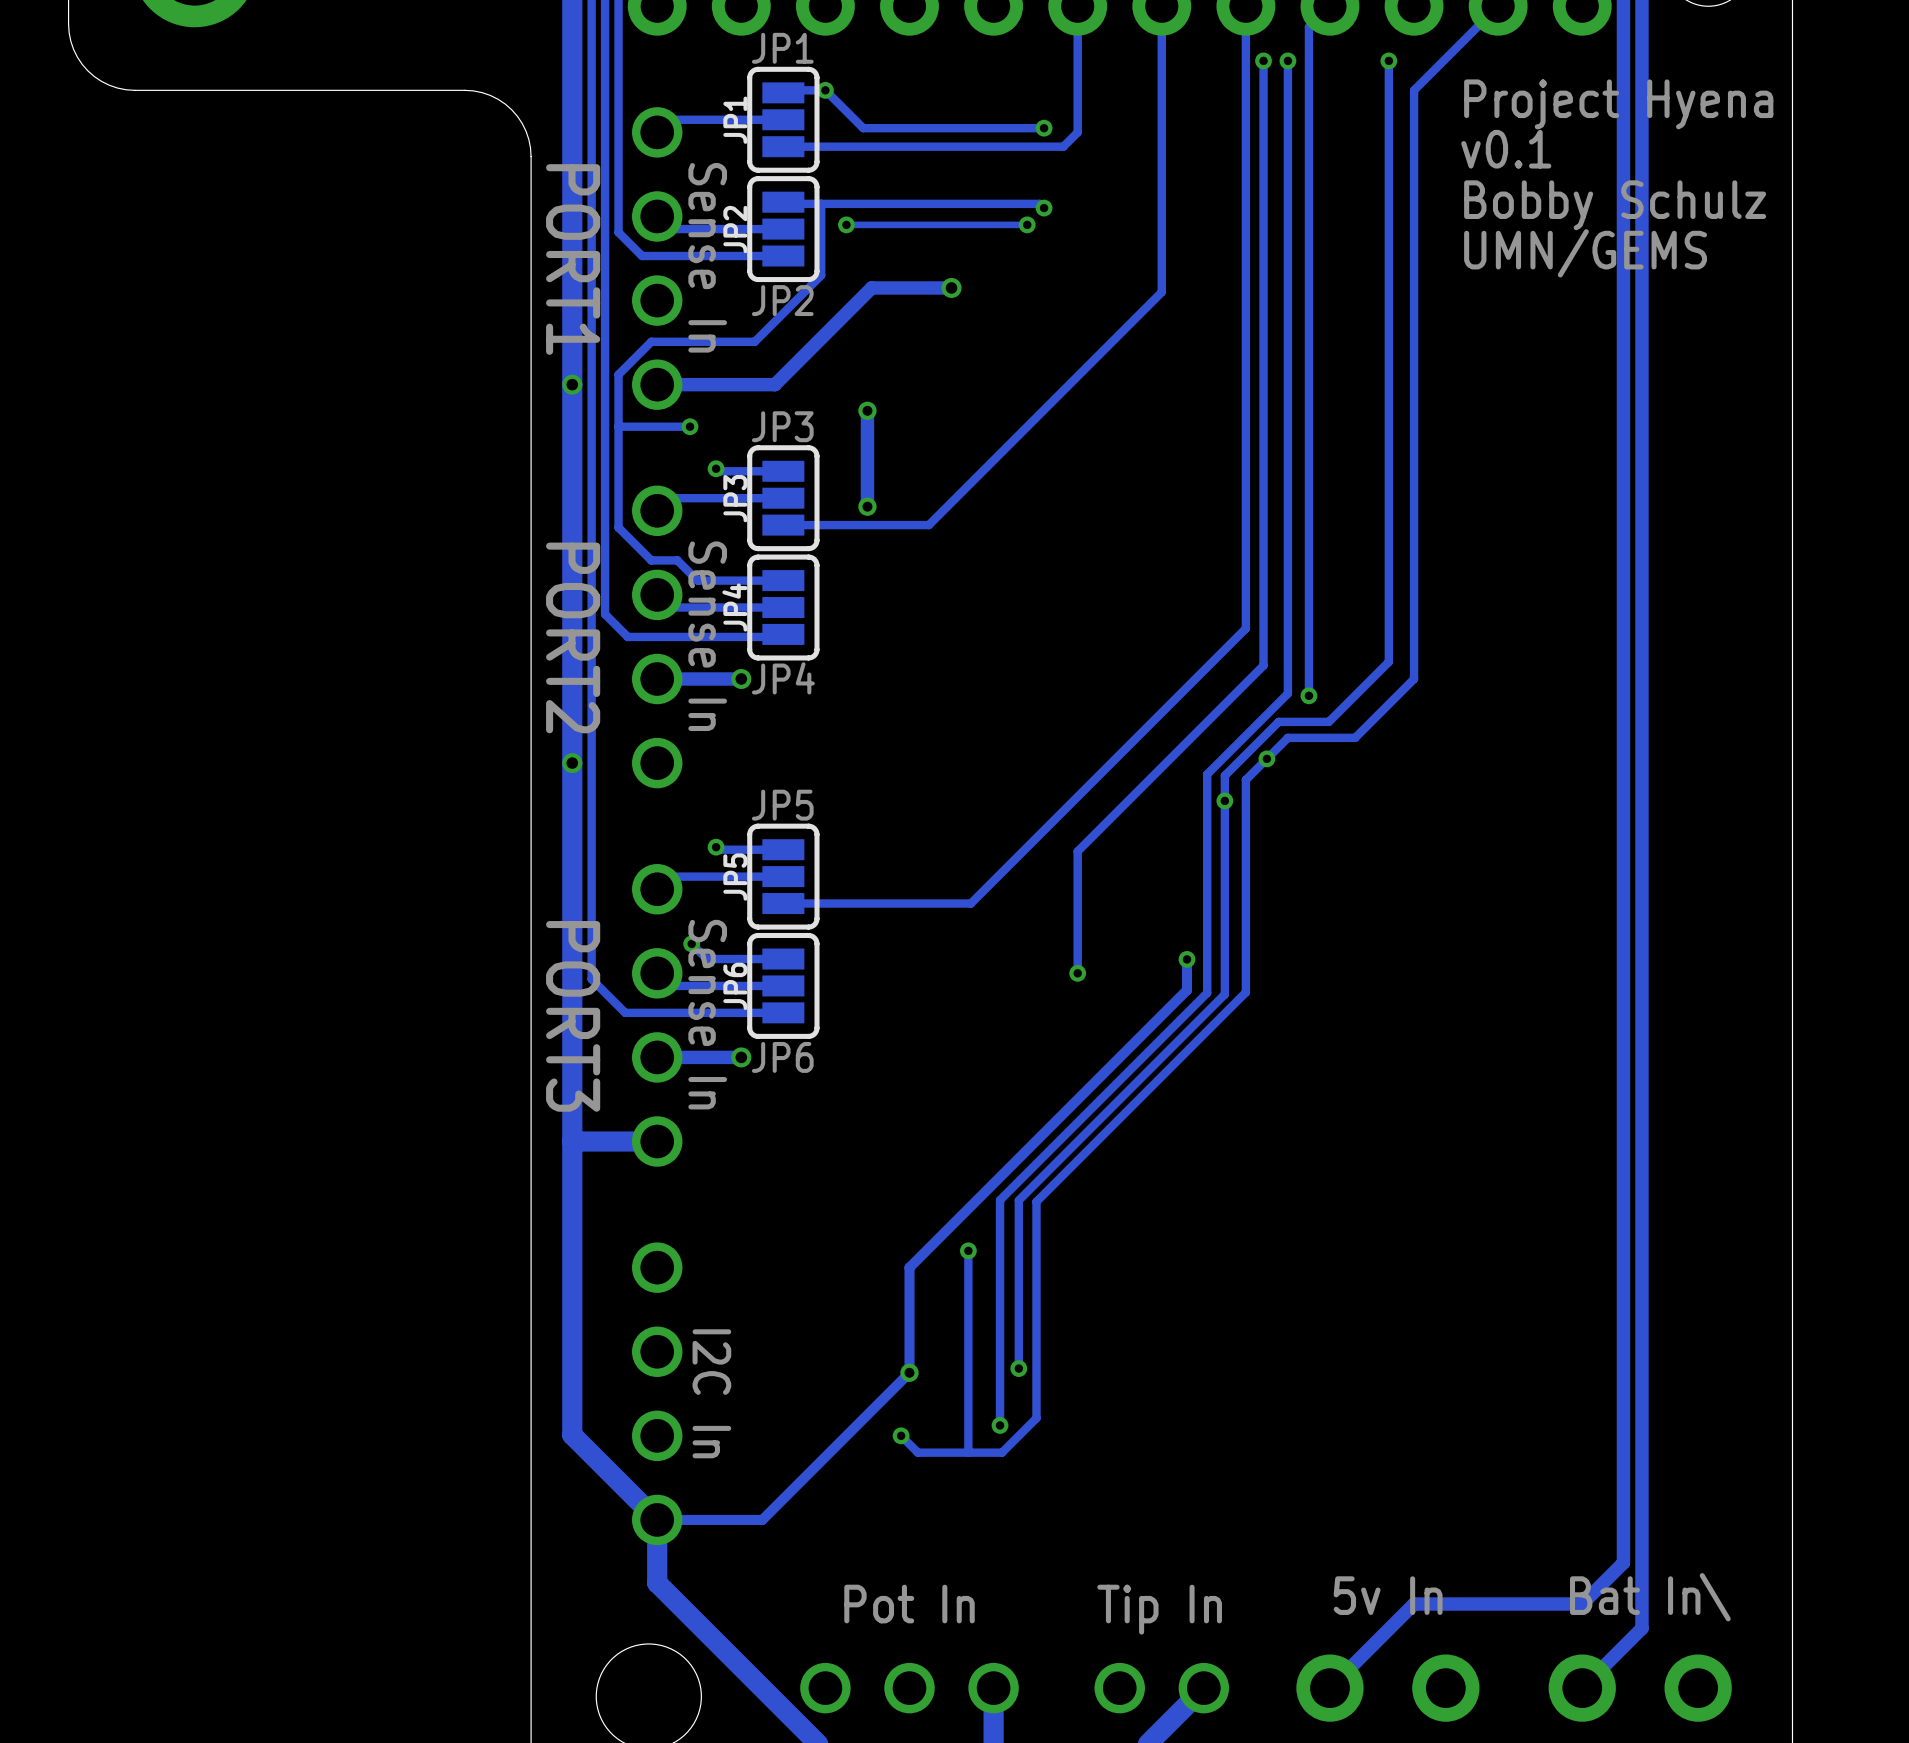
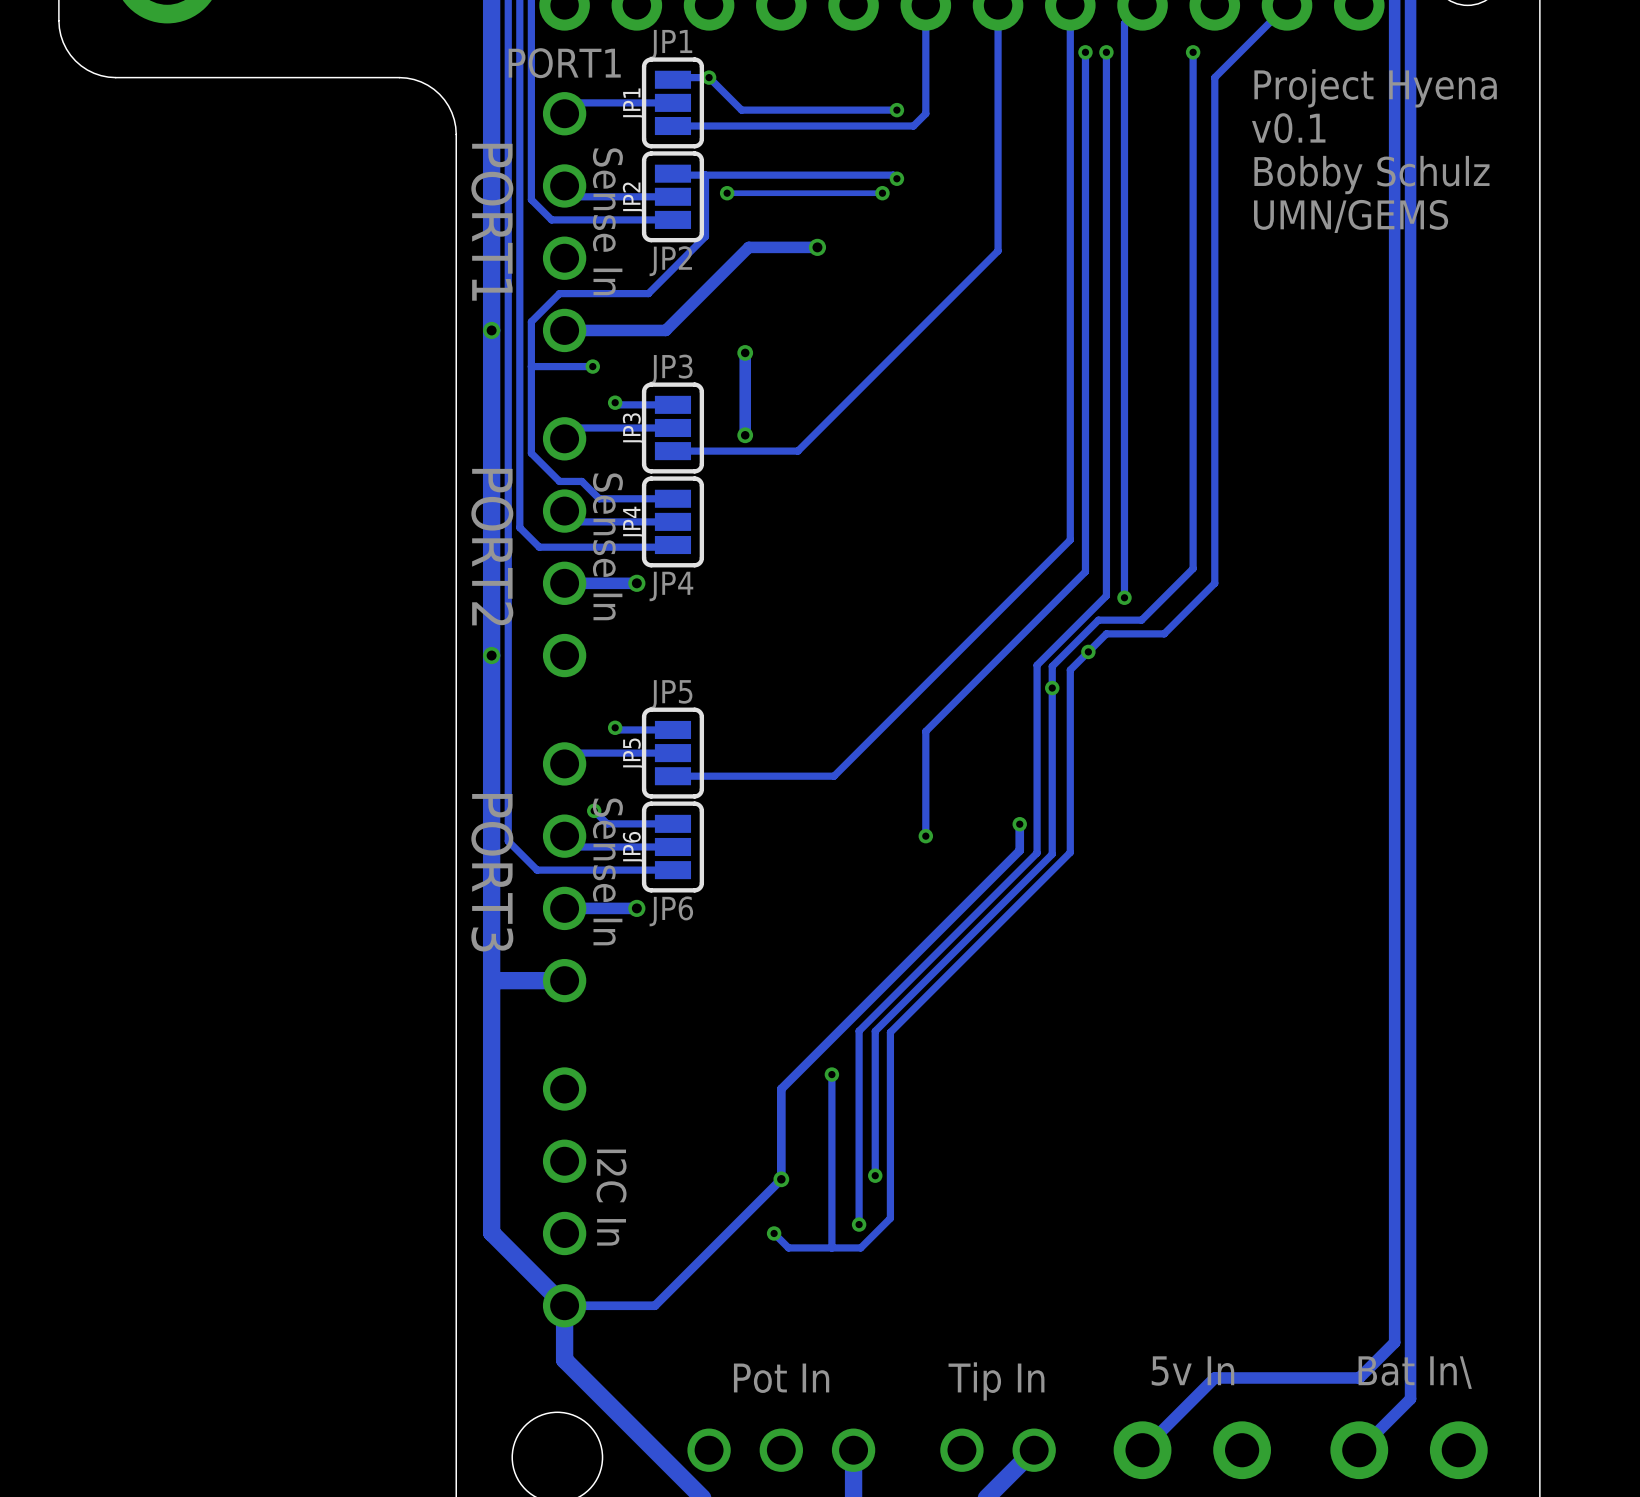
text: none -> PORT1 (564, 63)

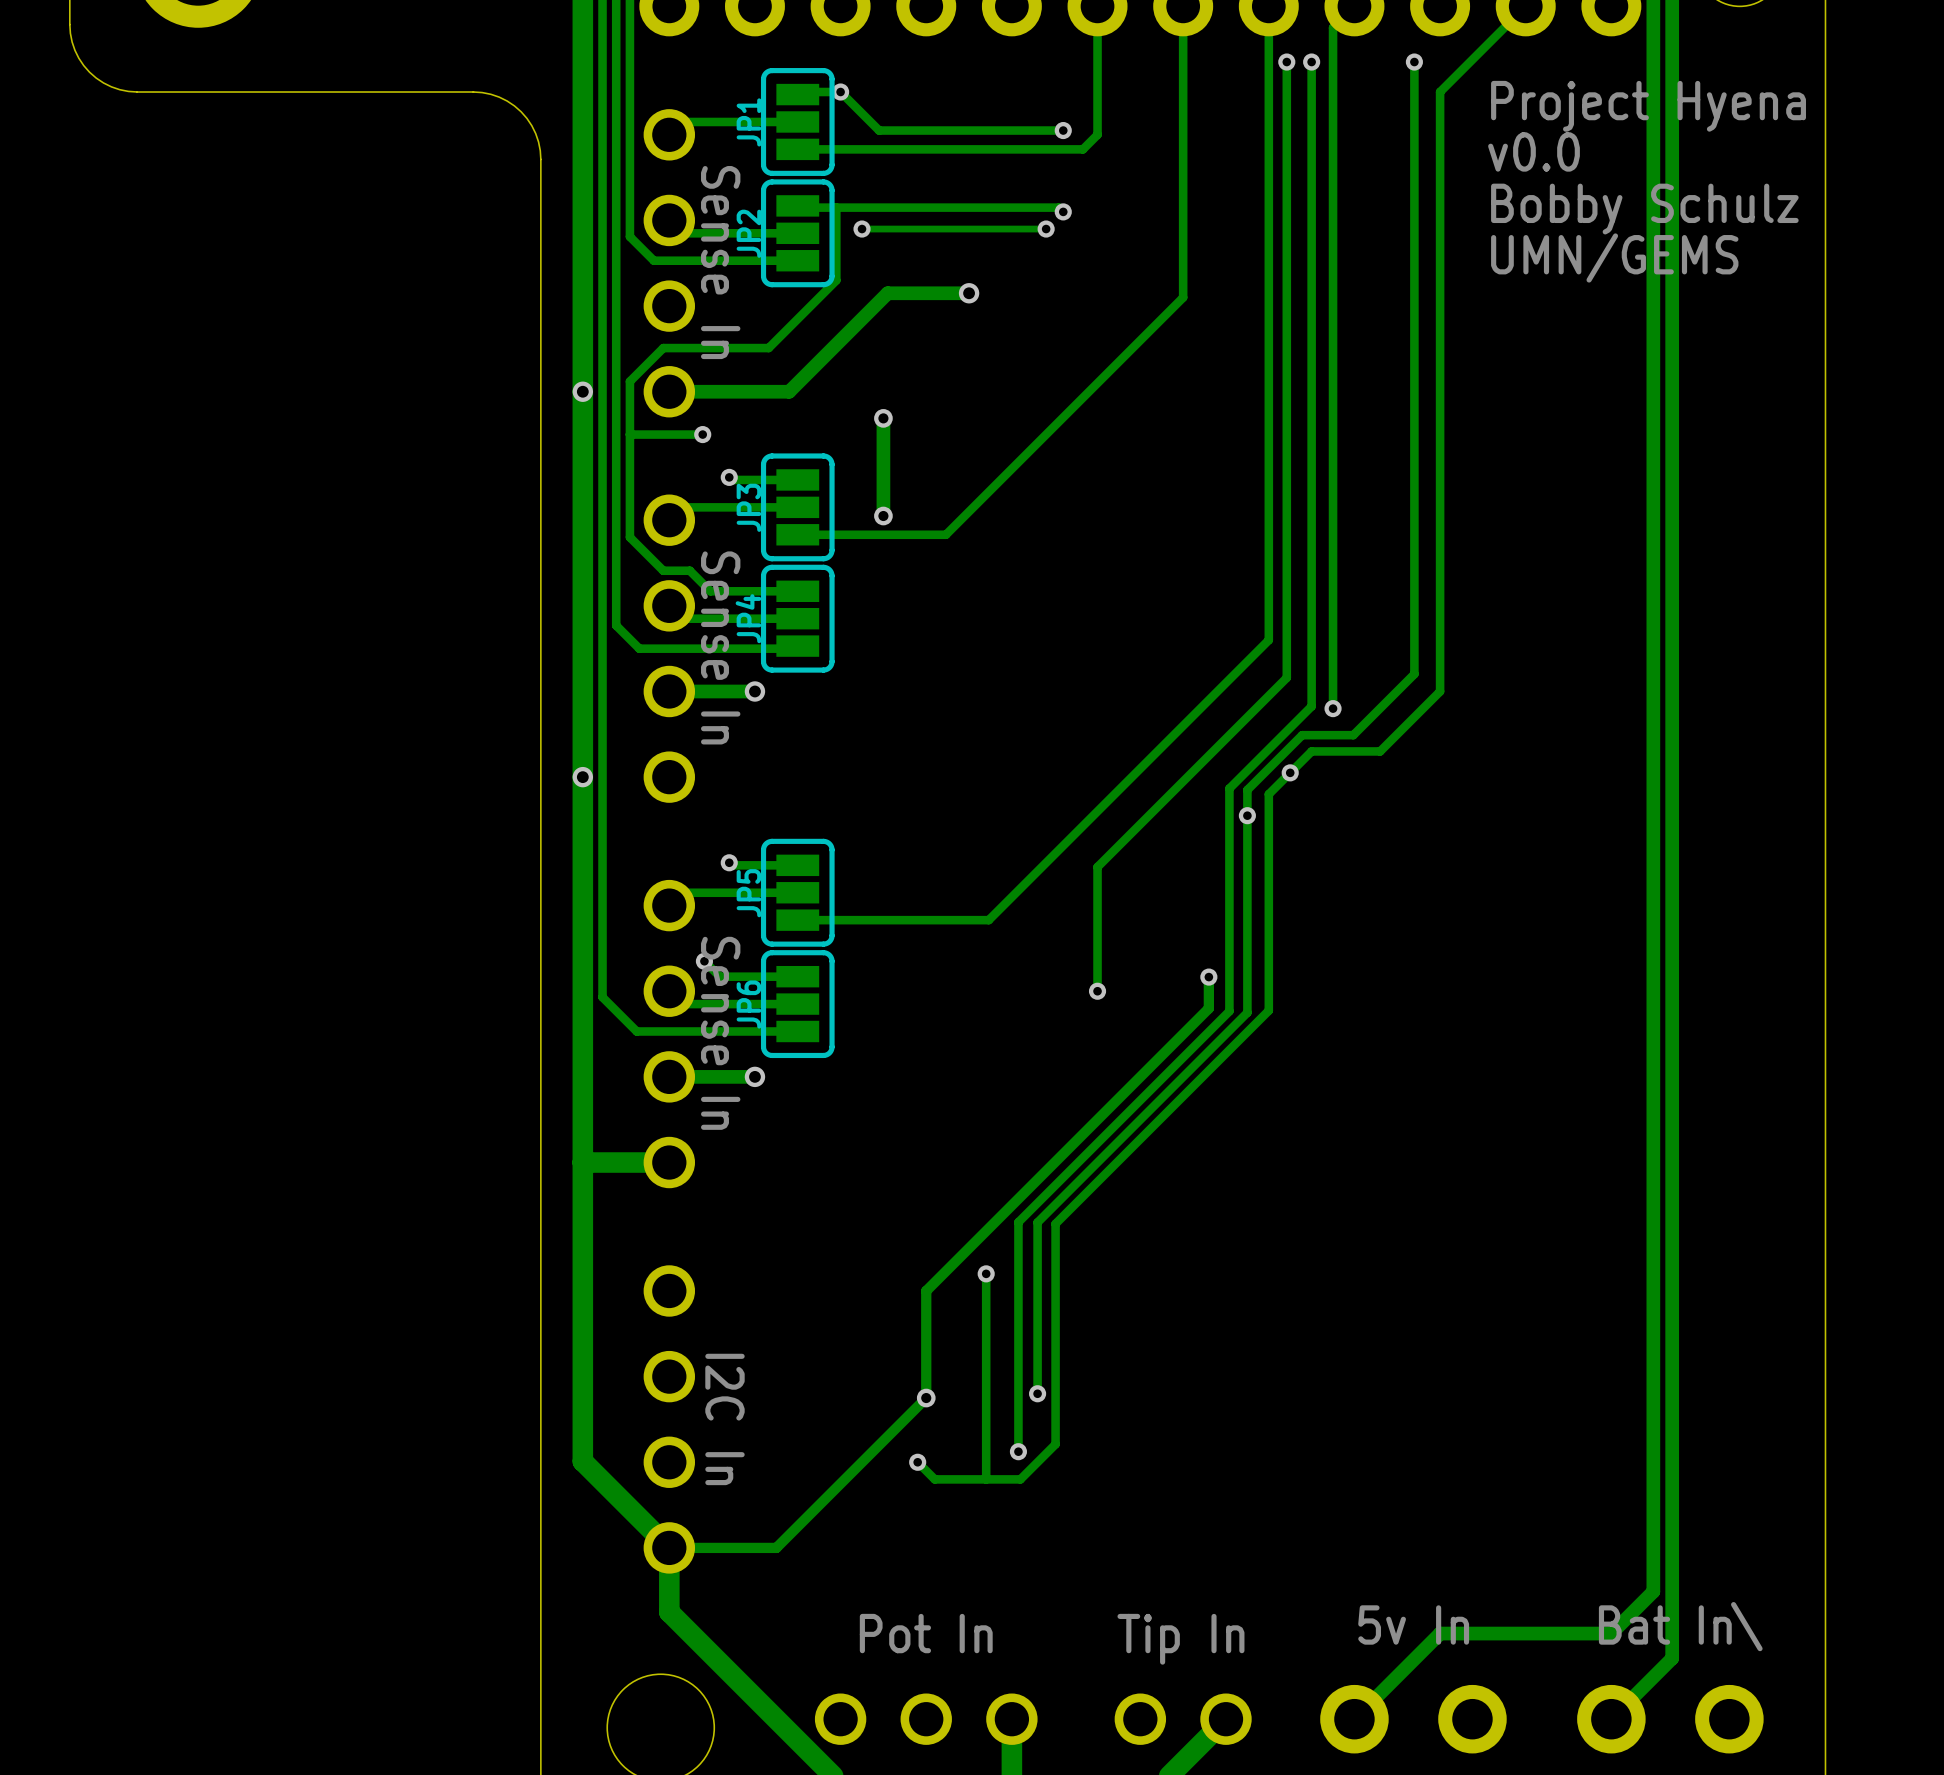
text: JP1 (670, 44) -> none
text: PORT1 (564, 63) -> none
text: v0.1 (1288, 128) -> v0.0 (1534, 151)
text: PORT1 (492, 222) -> none
text: JP2 (670, 261) -> none
text: JP3 (671, 369) -> none
text: PORT2 (492, 547) -> none
text: JP4 (671, 586) -> none
text: JP5 (670, 694) -> none
text: PORT3 (492, 872) -> none
text: JP6 (671, 911) -> none

